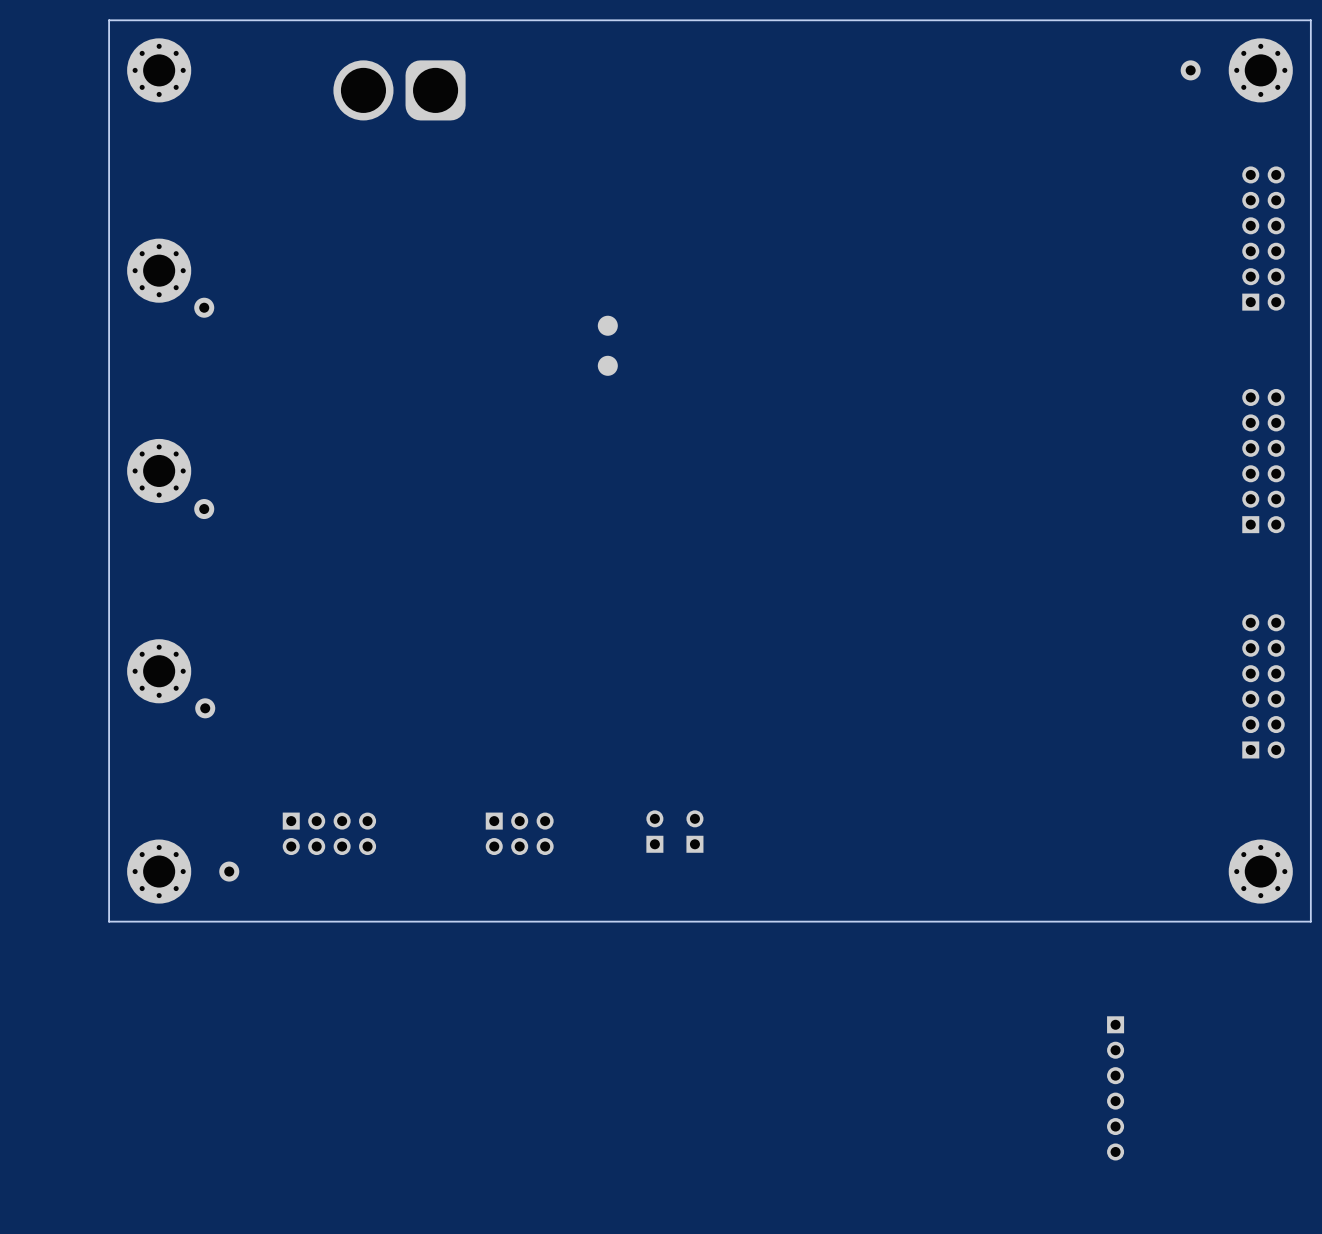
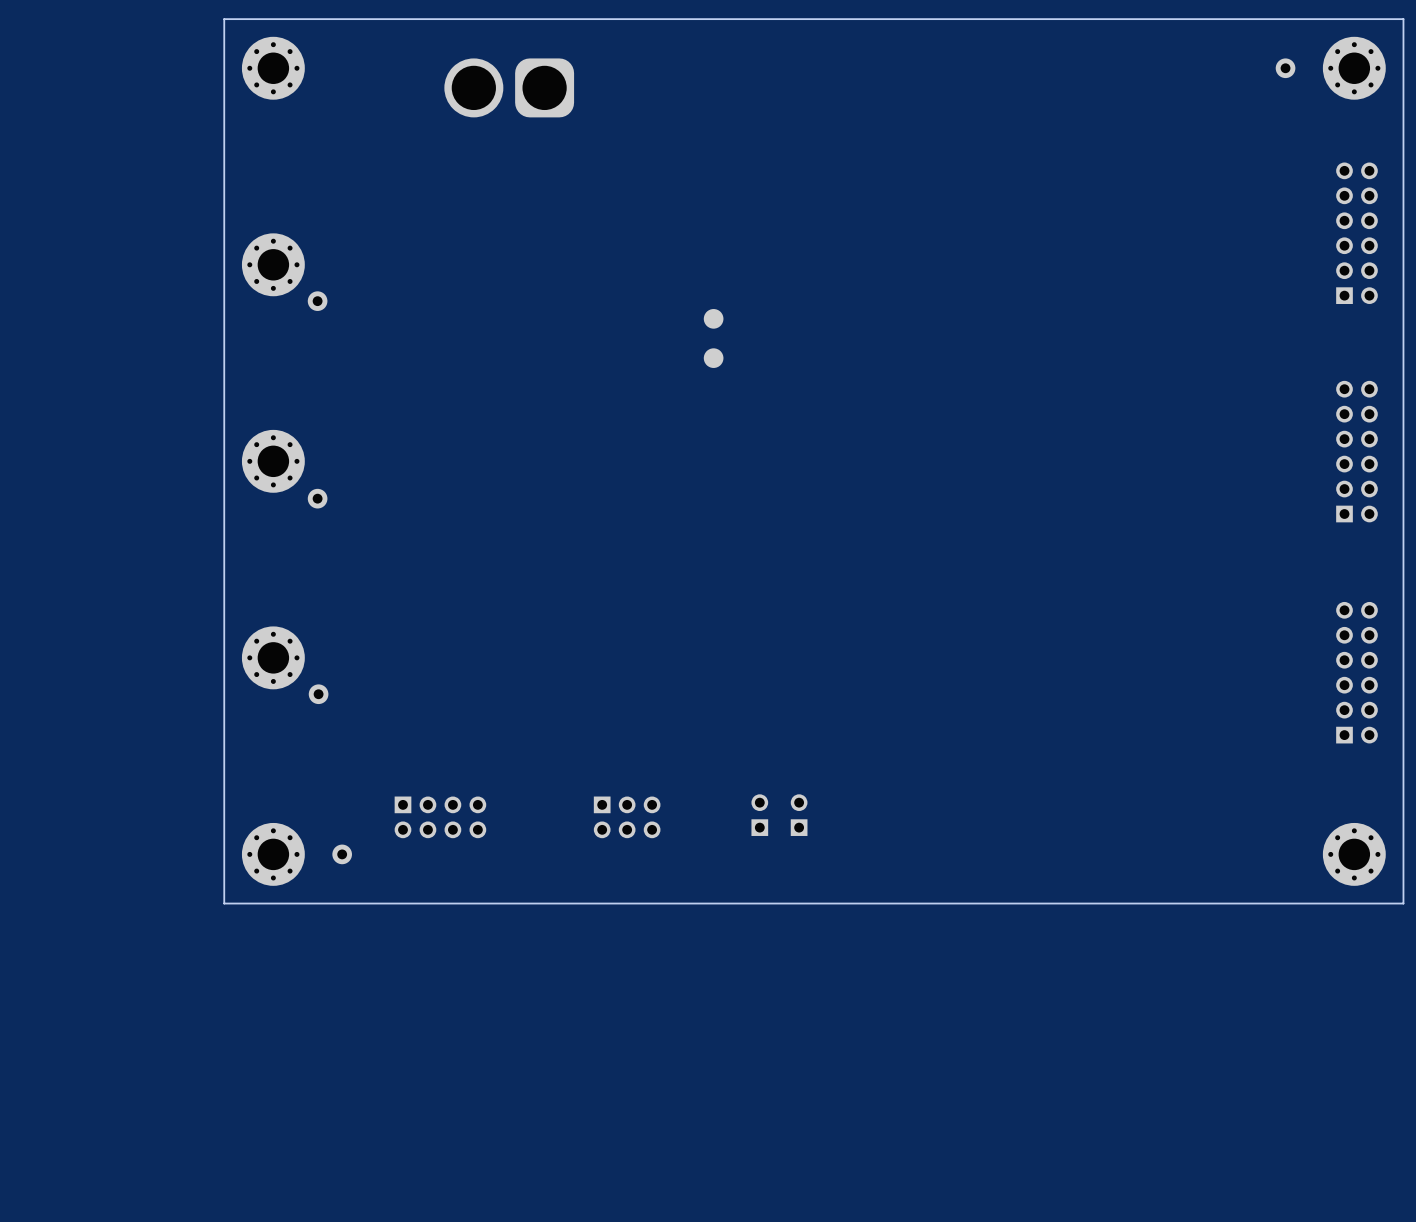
part: (1115, 1088) -> none

